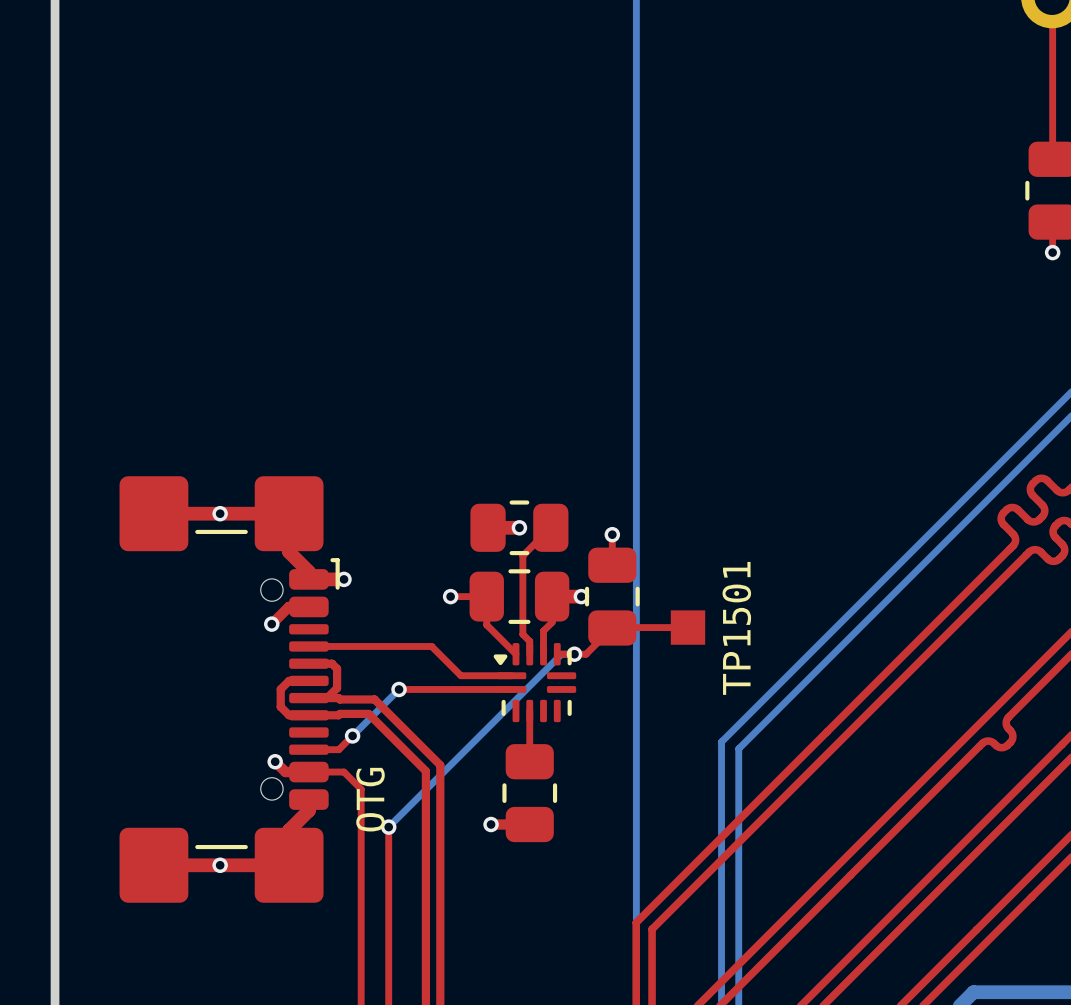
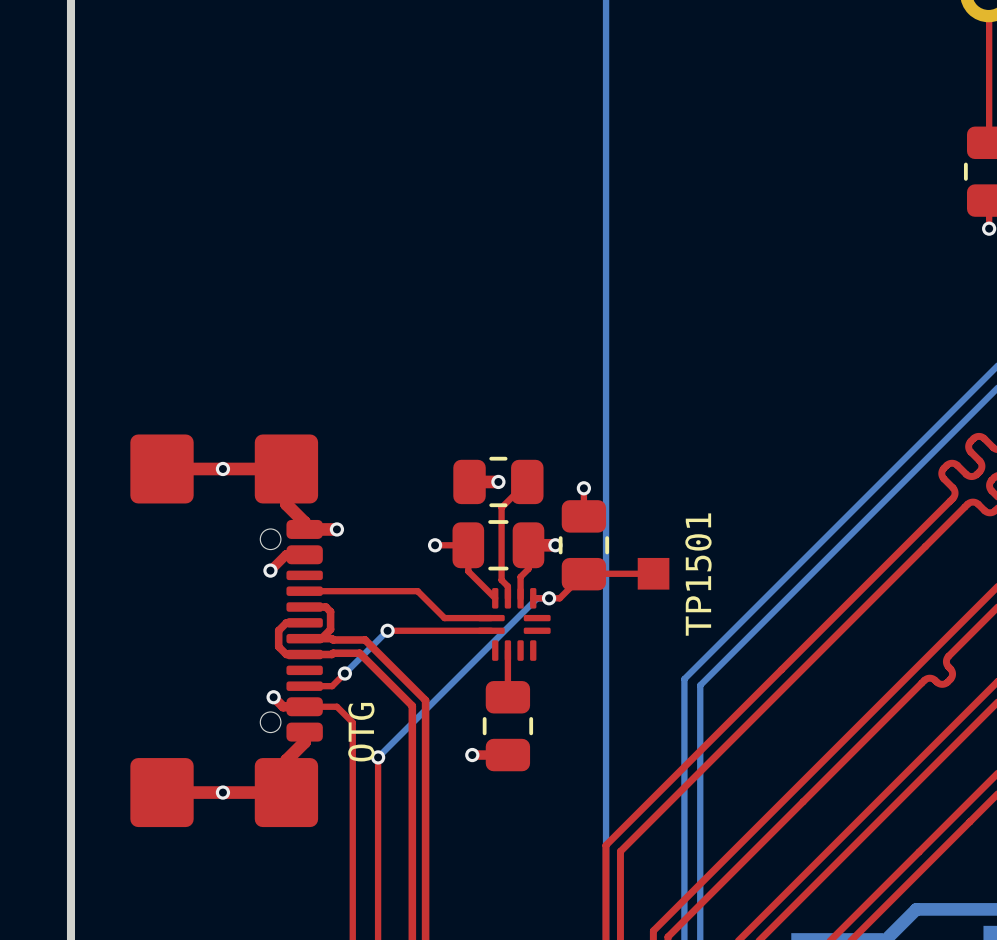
part footprint: [119, 476, 340, 903] -> [130, 434, 323, 828]
part footprint: [493, 643, 577, 723] -> [477, 588, 551, 661]

